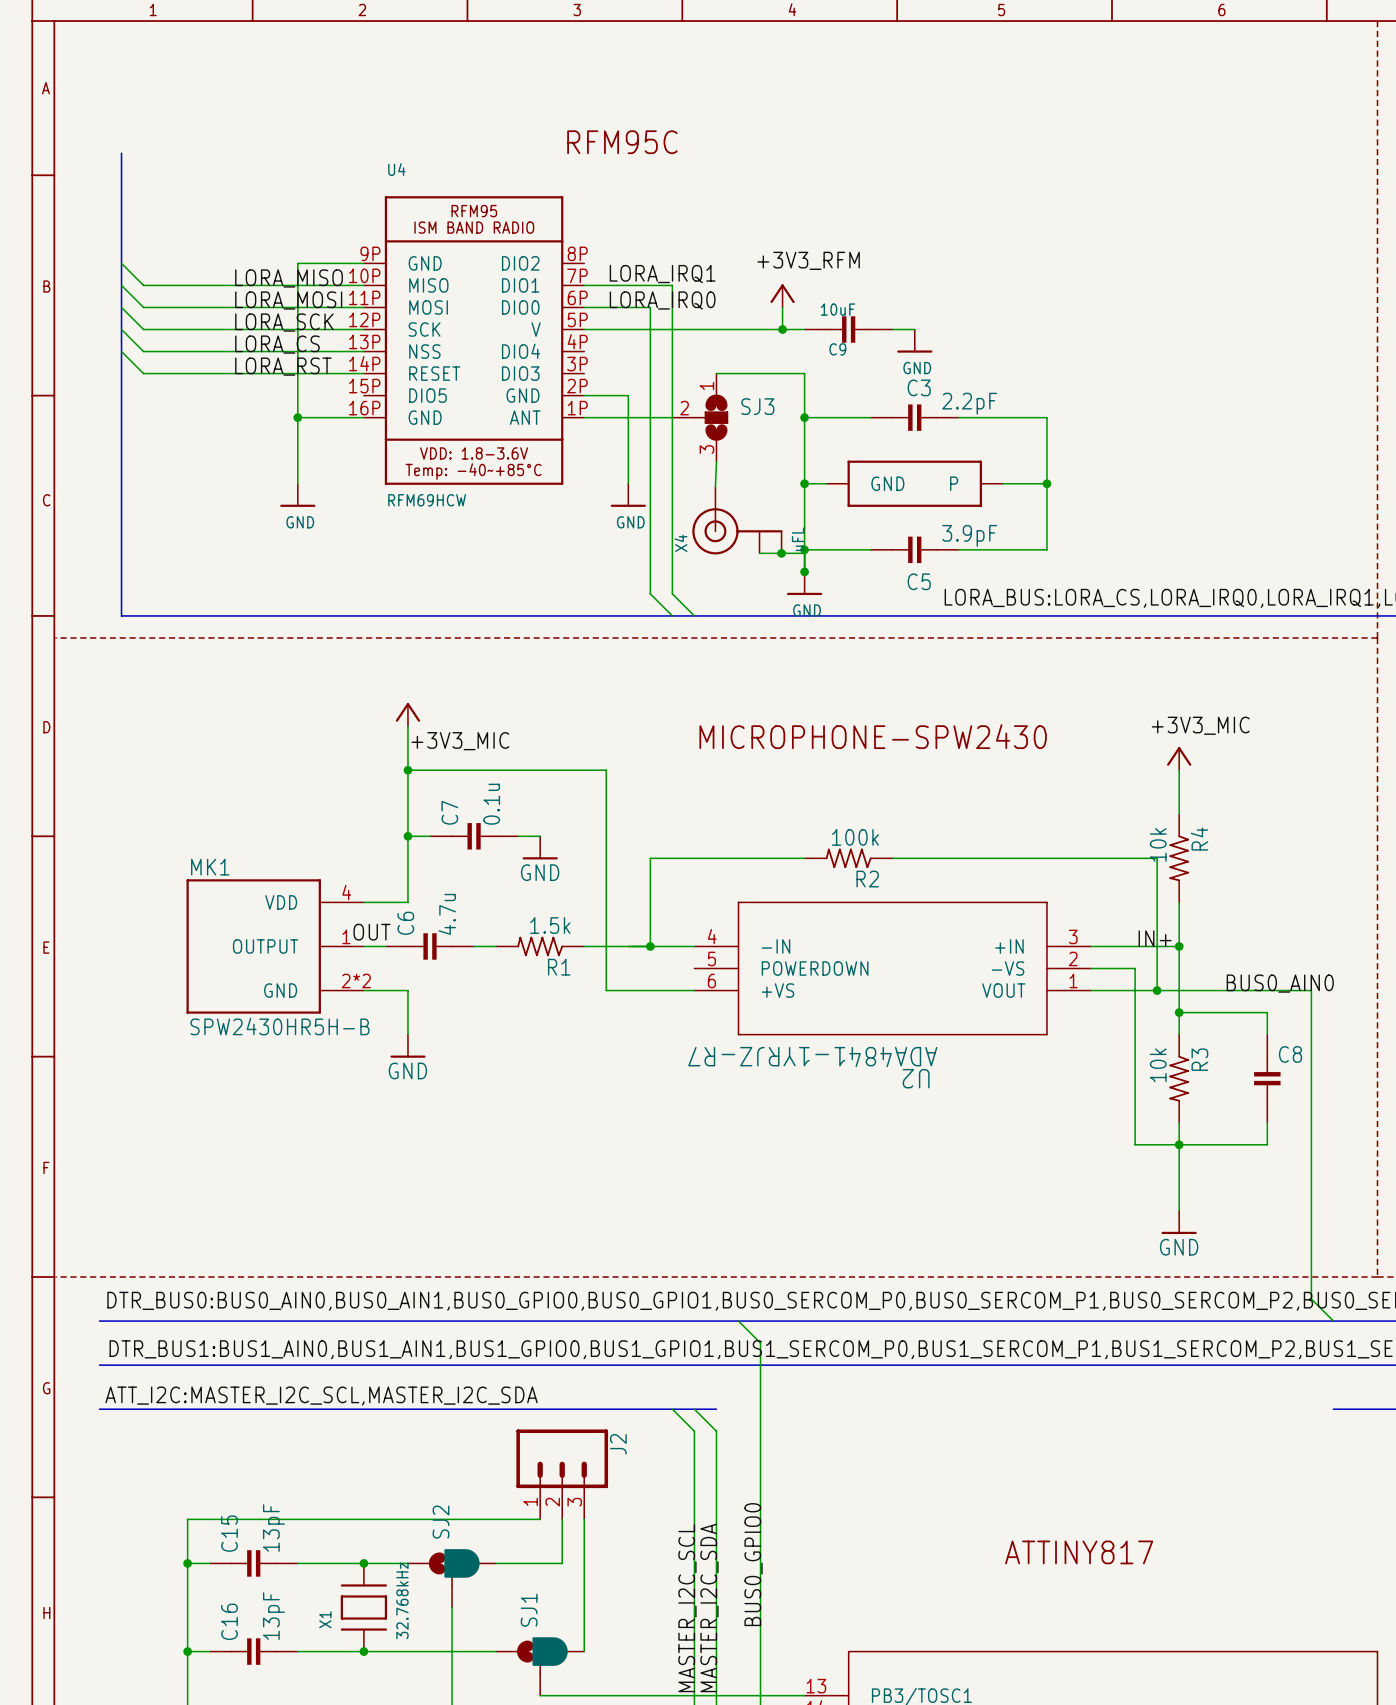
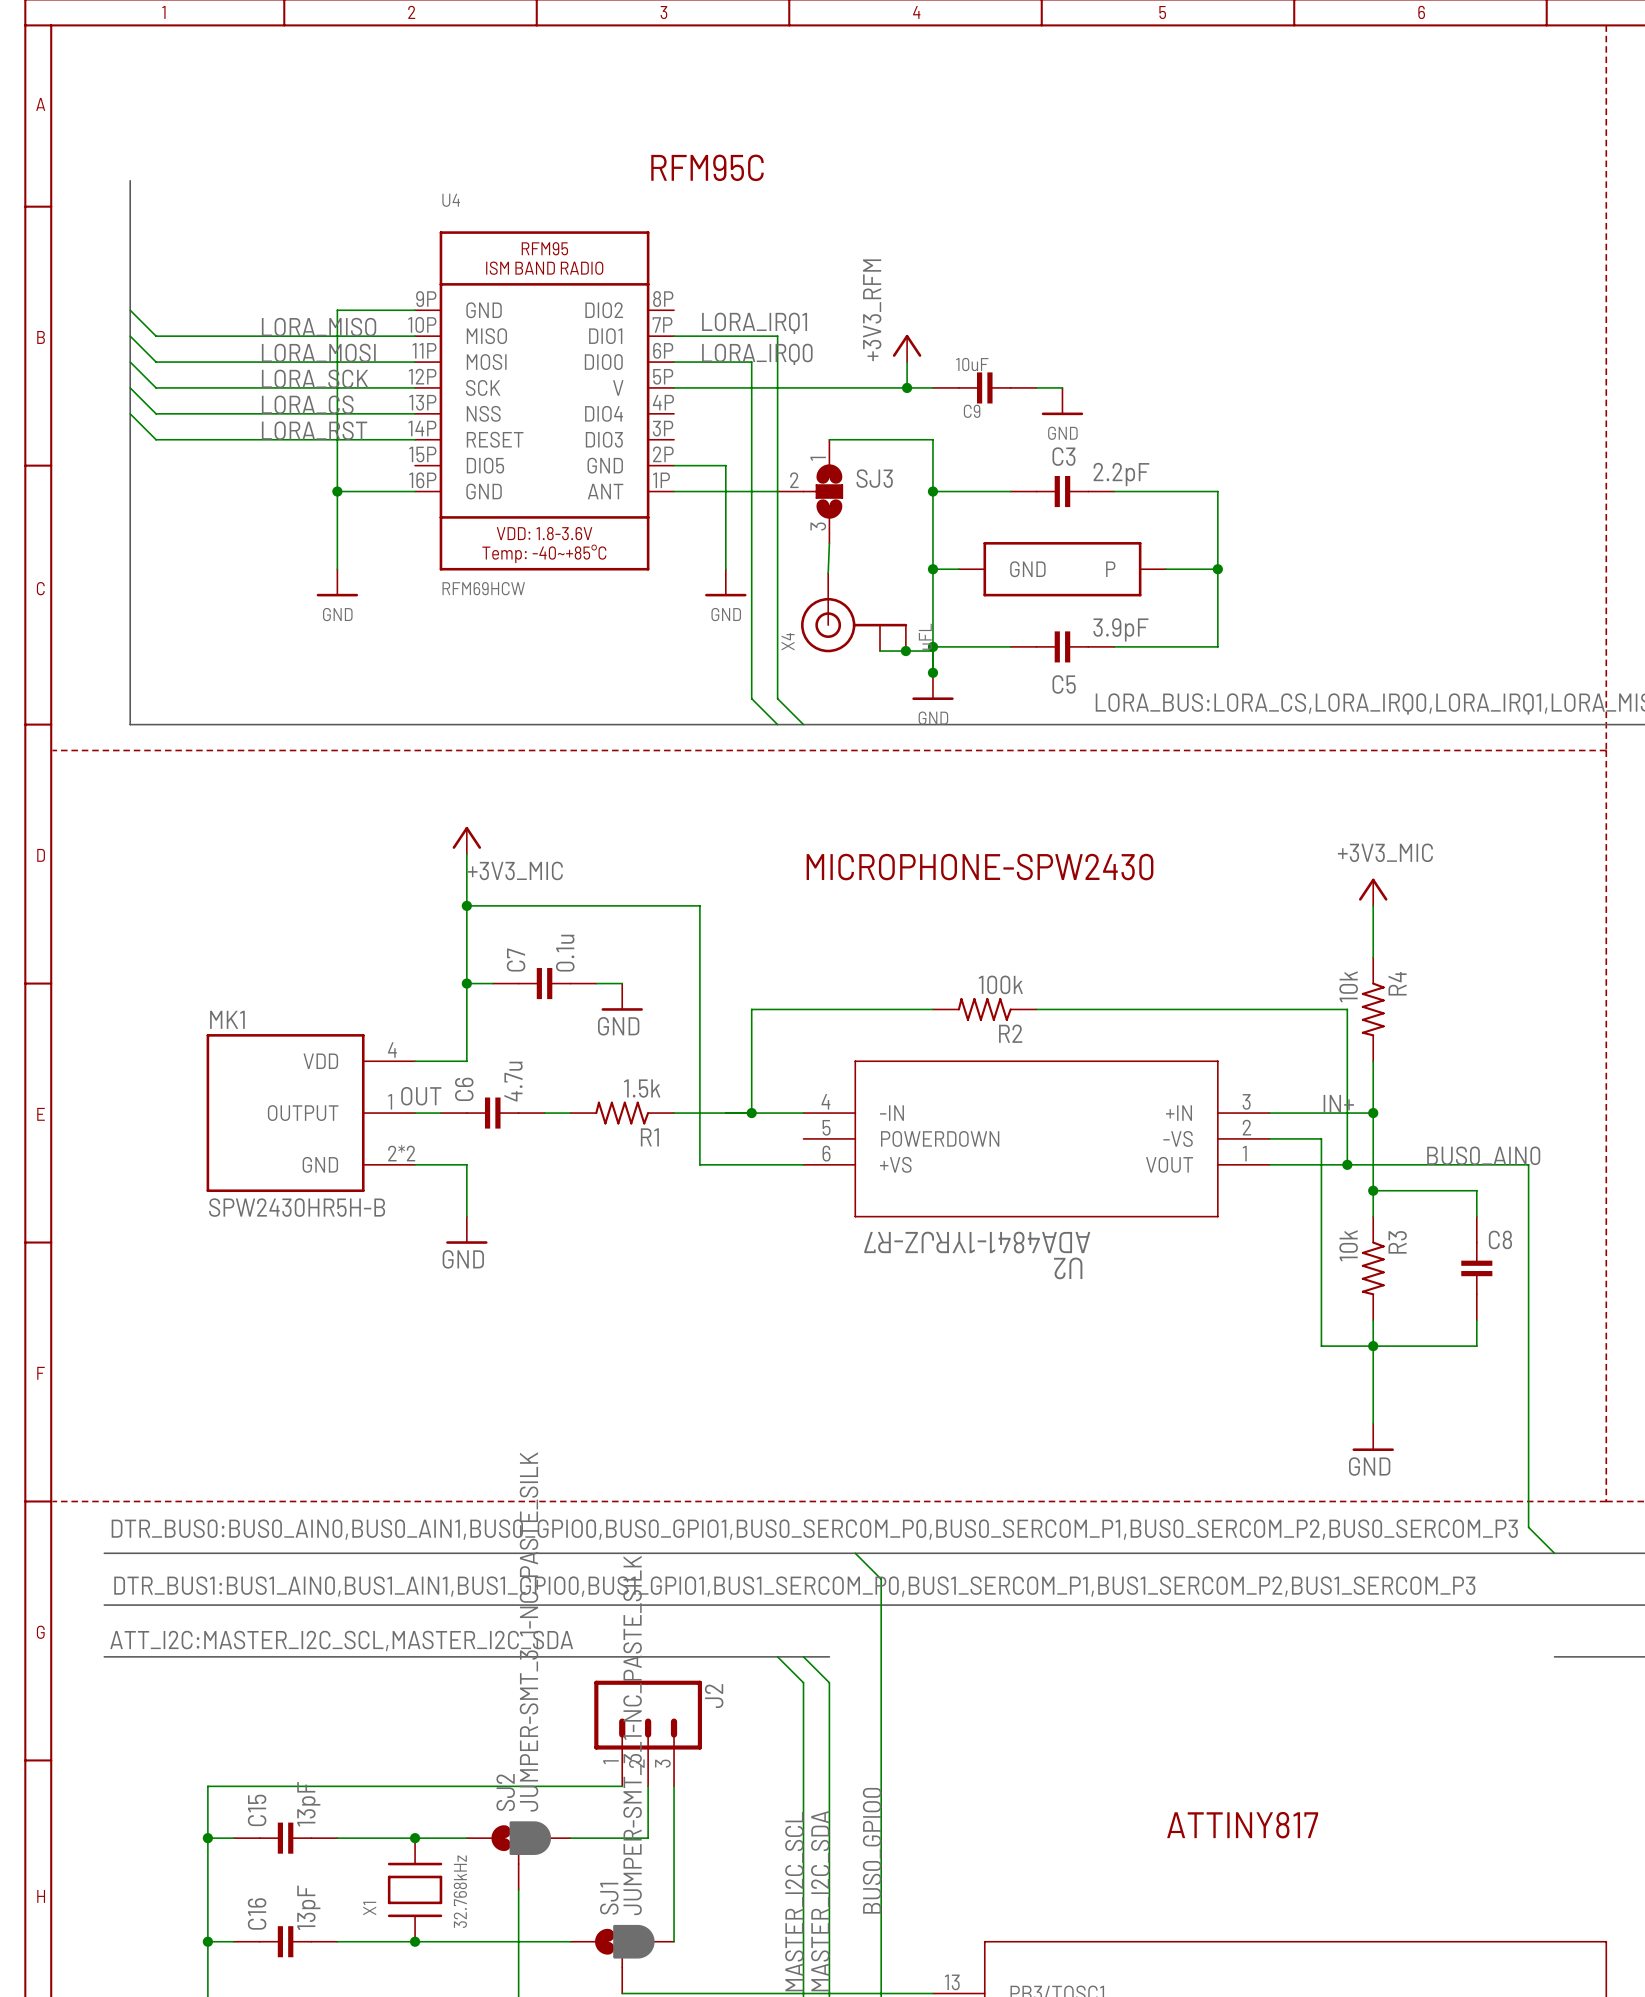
label rotation: 0° (808, 260) -> 90° counterclockwise (872, 310)
SJ2 value: none -> JUMPER-SMT_3_1-NC_PASTE_SILK (529, 1631)
SJ1 value: none -> JUMPER-SMT_3_1-NC_PASTE_SILK (632, 1735)

